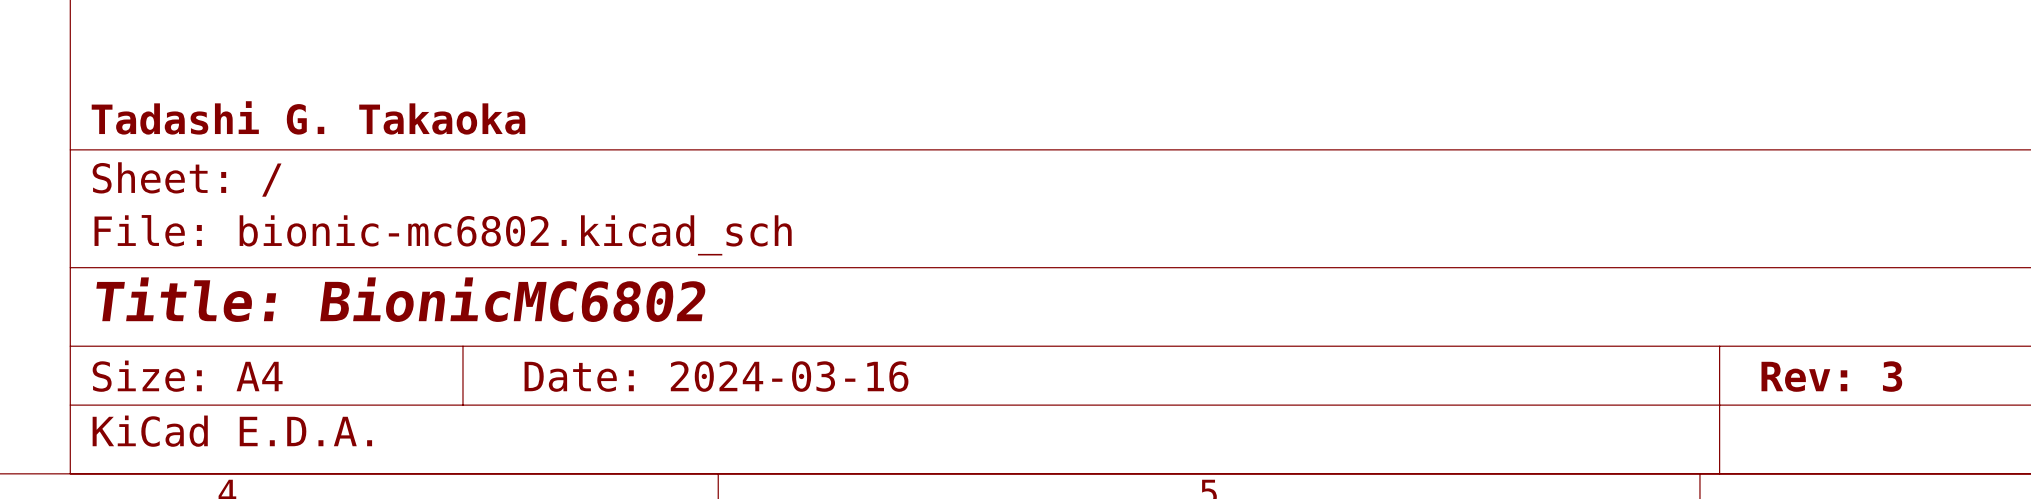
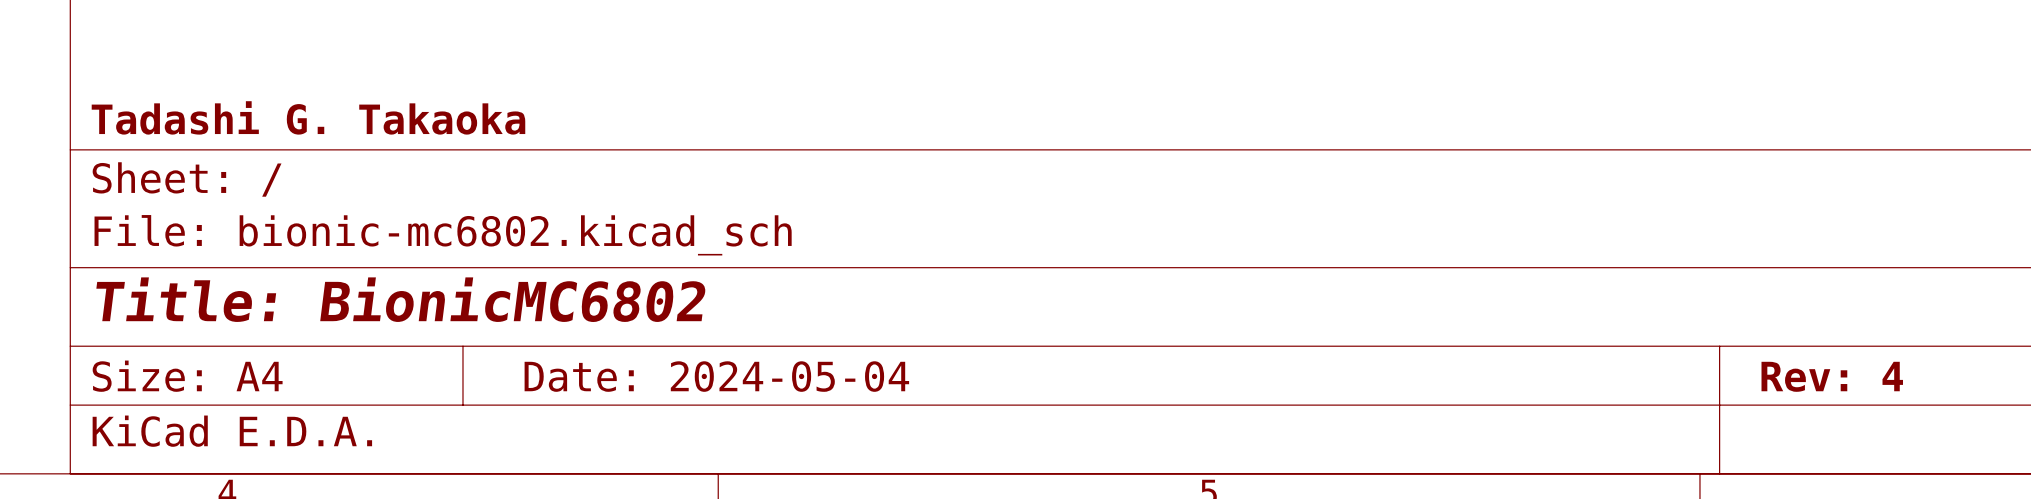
title block: Date: 2024-03-16 (716, 376) -> Date: 2024-05-04 (716, 376)
title block: Rev: 3 (1831, 376) -> Rev: 4 (1832, 376)

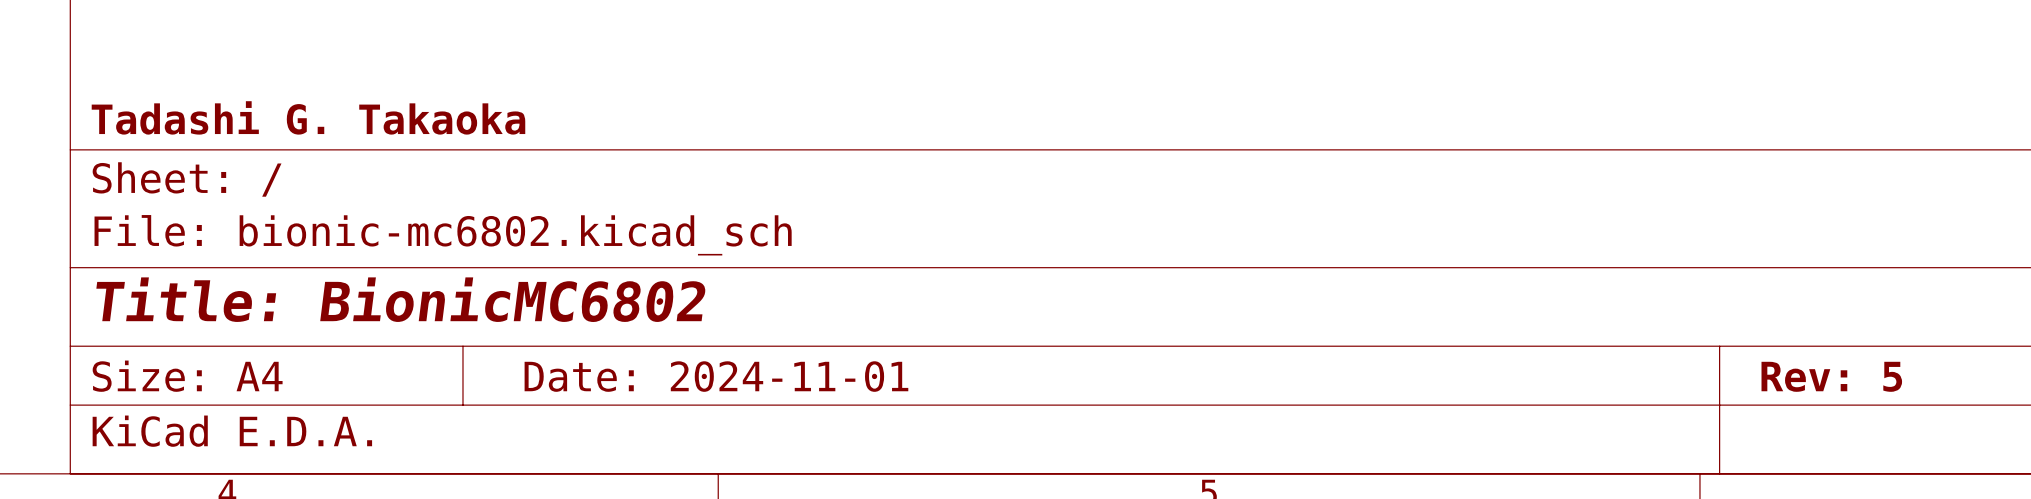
title block: Date: 2024-05-04 (716, 376) -> Date: 2024-11-01 (716, 376)
title block: Rev: 4 (1832, 376) -> Rev: 5 (1831, 376)

